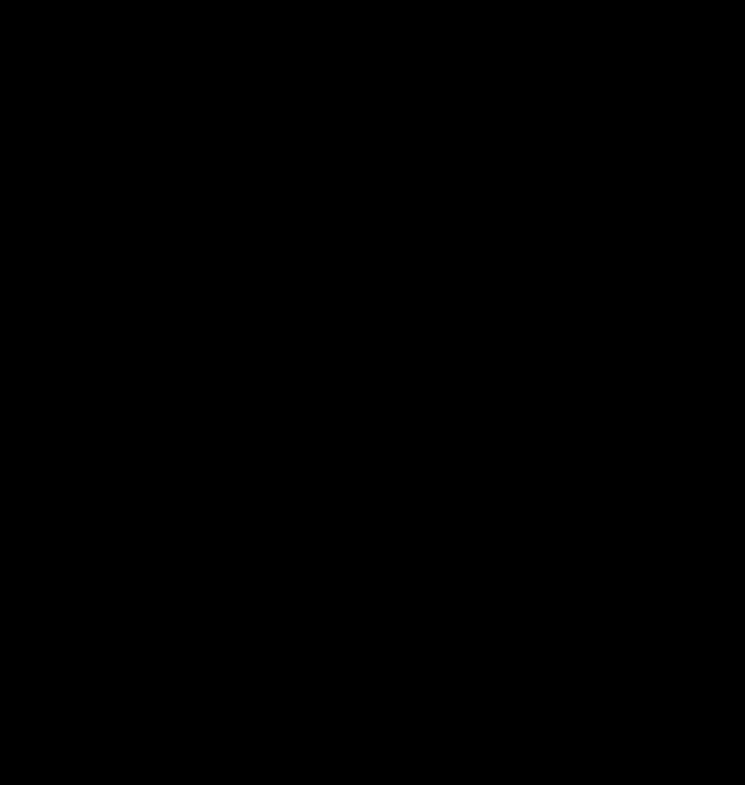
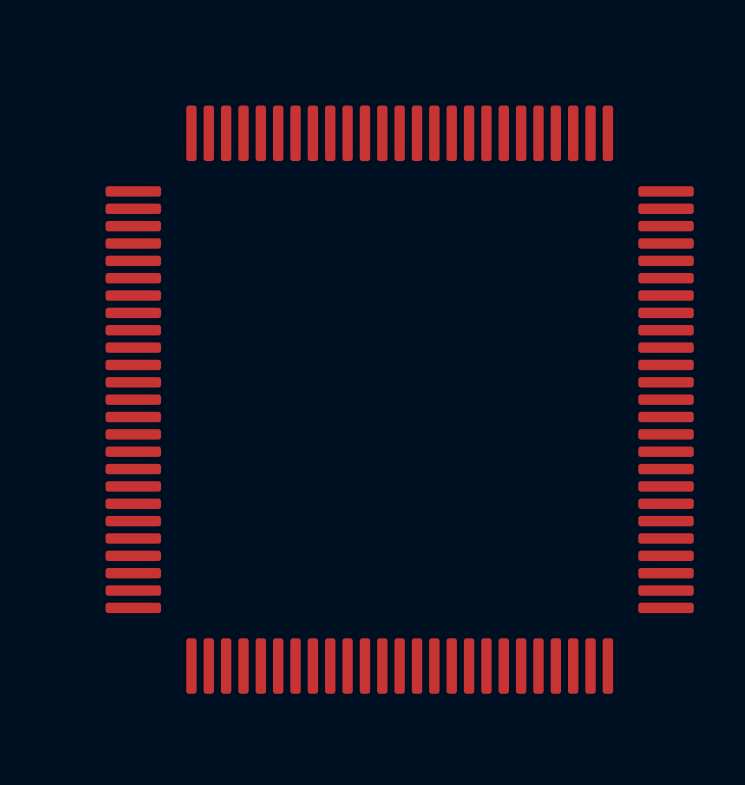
part: none -> (399, 399)

